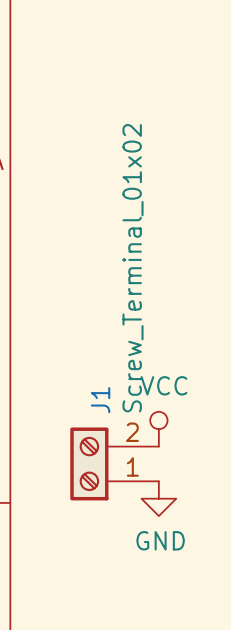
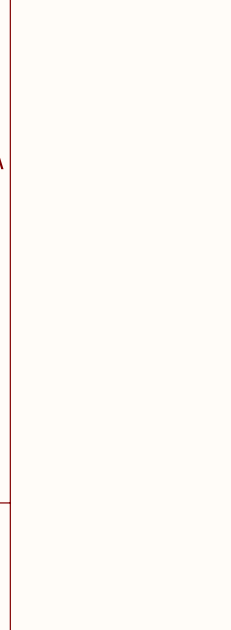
power symbol: VCC (158, 429) -> none
J1: Screw_Terminal_01x02 (114, 463) -> none
power symbol: GND (158, 498) -> none

